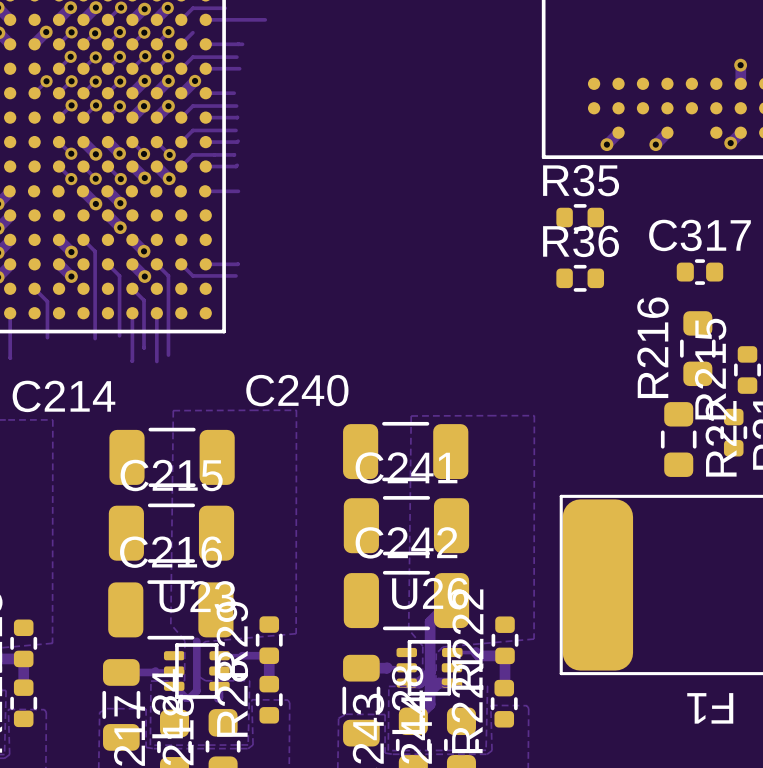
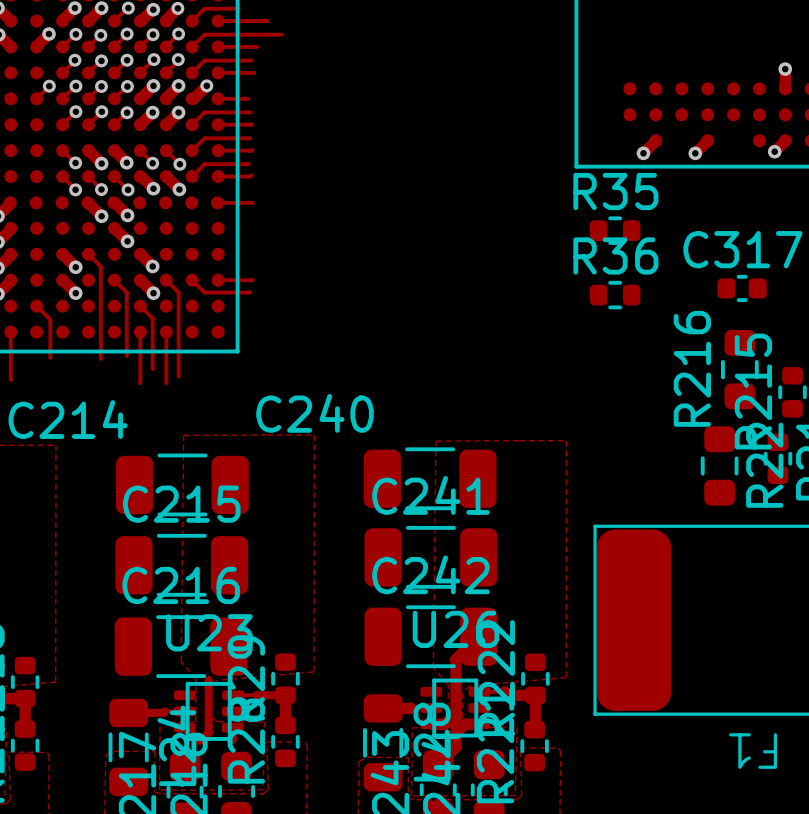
track: (252, 19) (265, 19) -> none
track: none -> (204, 34) (281, 34)

